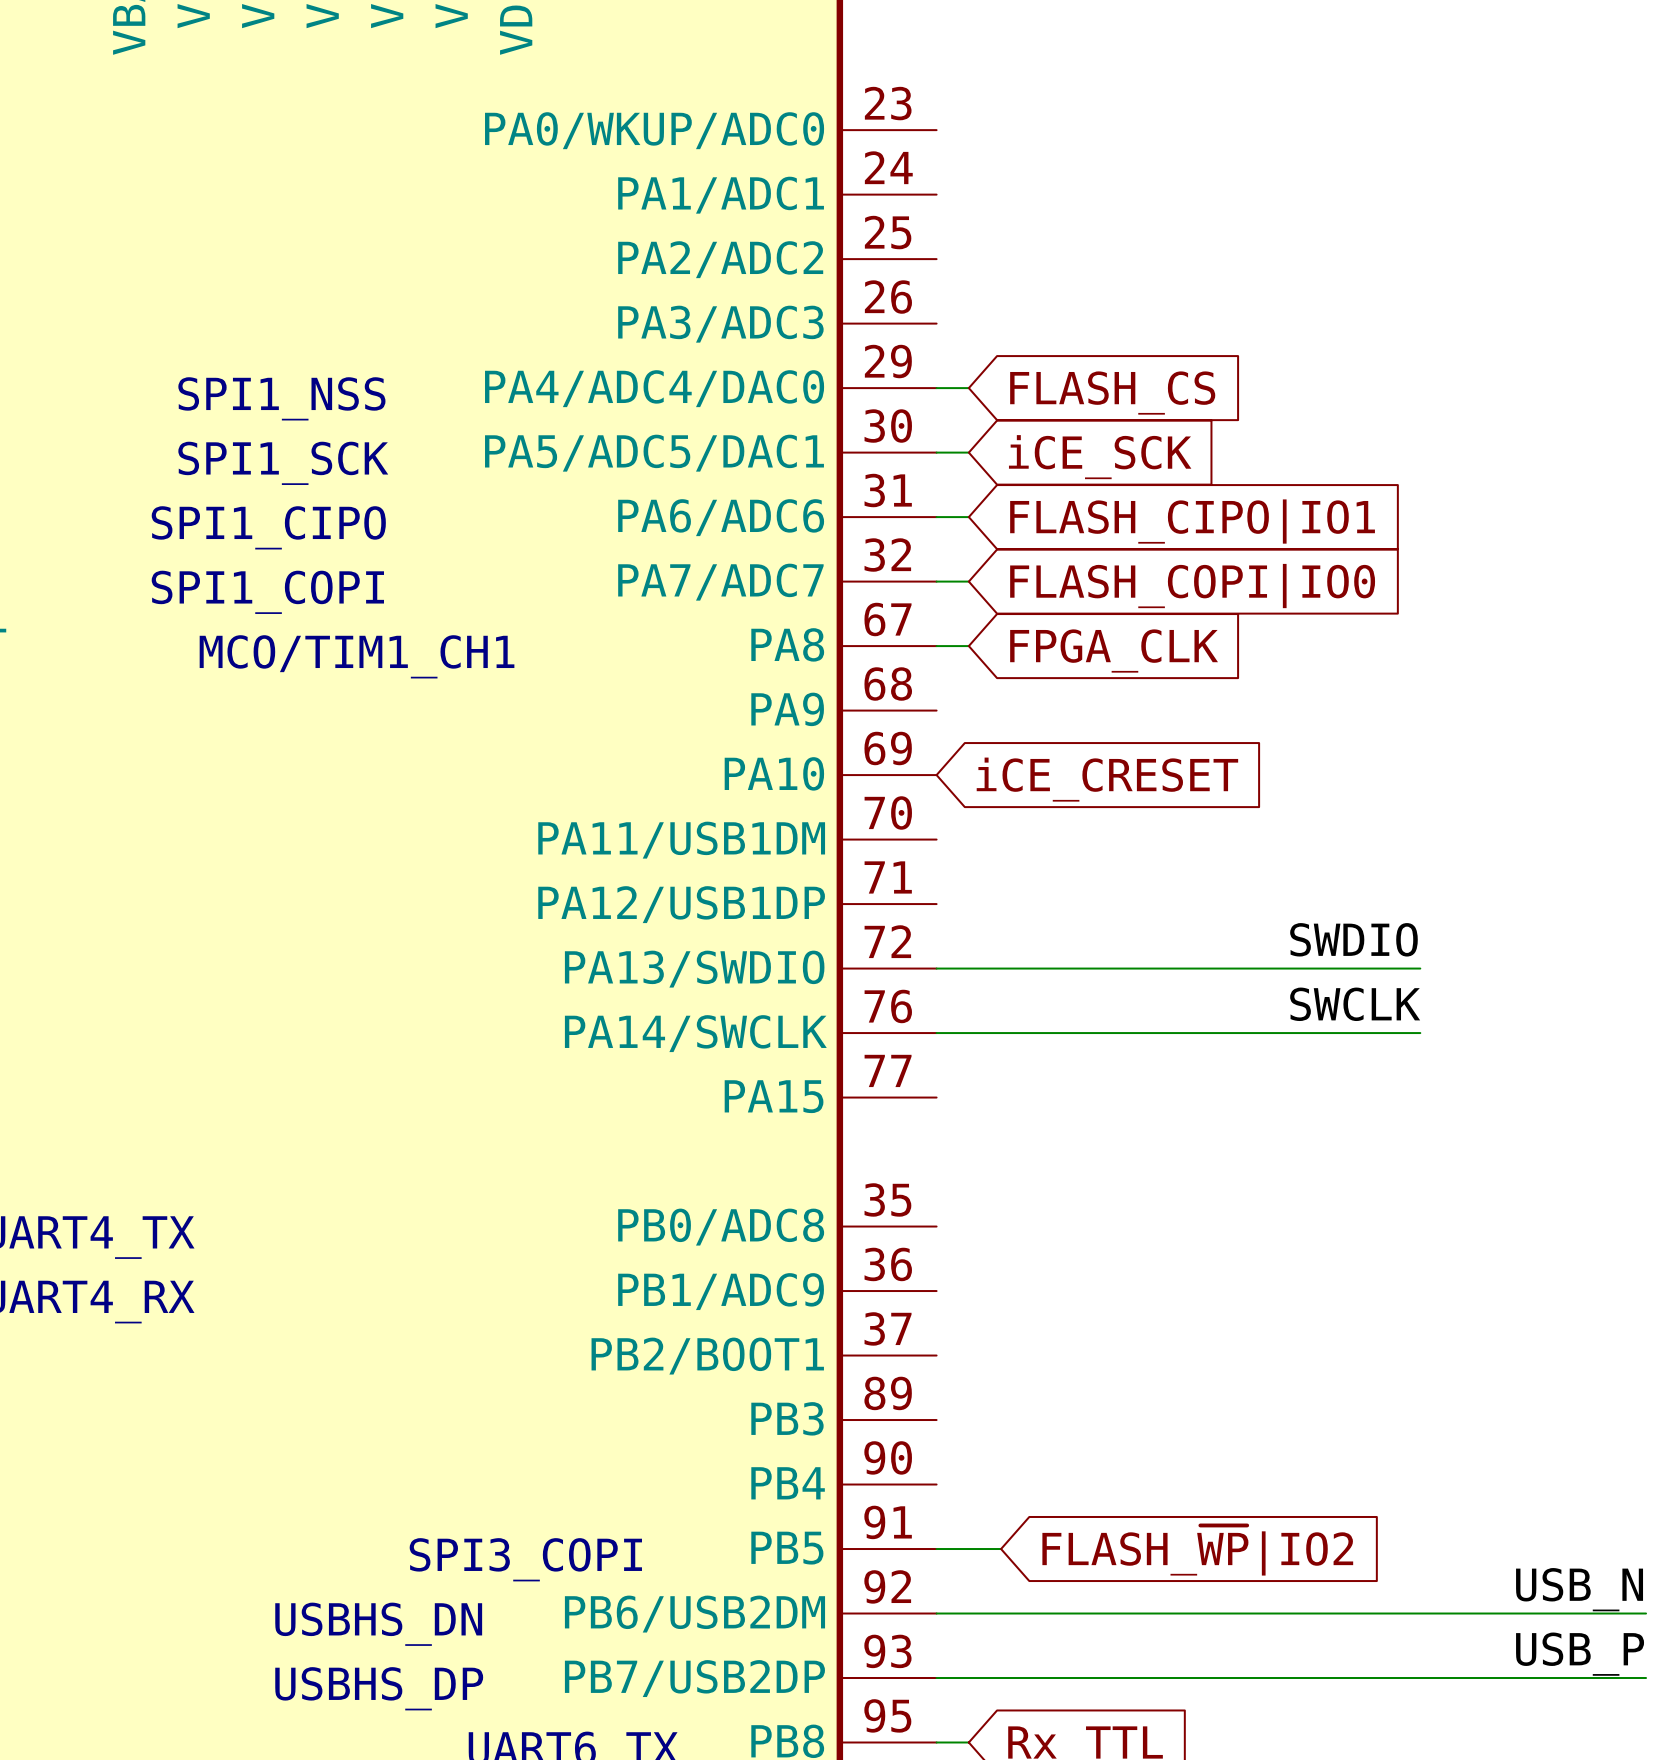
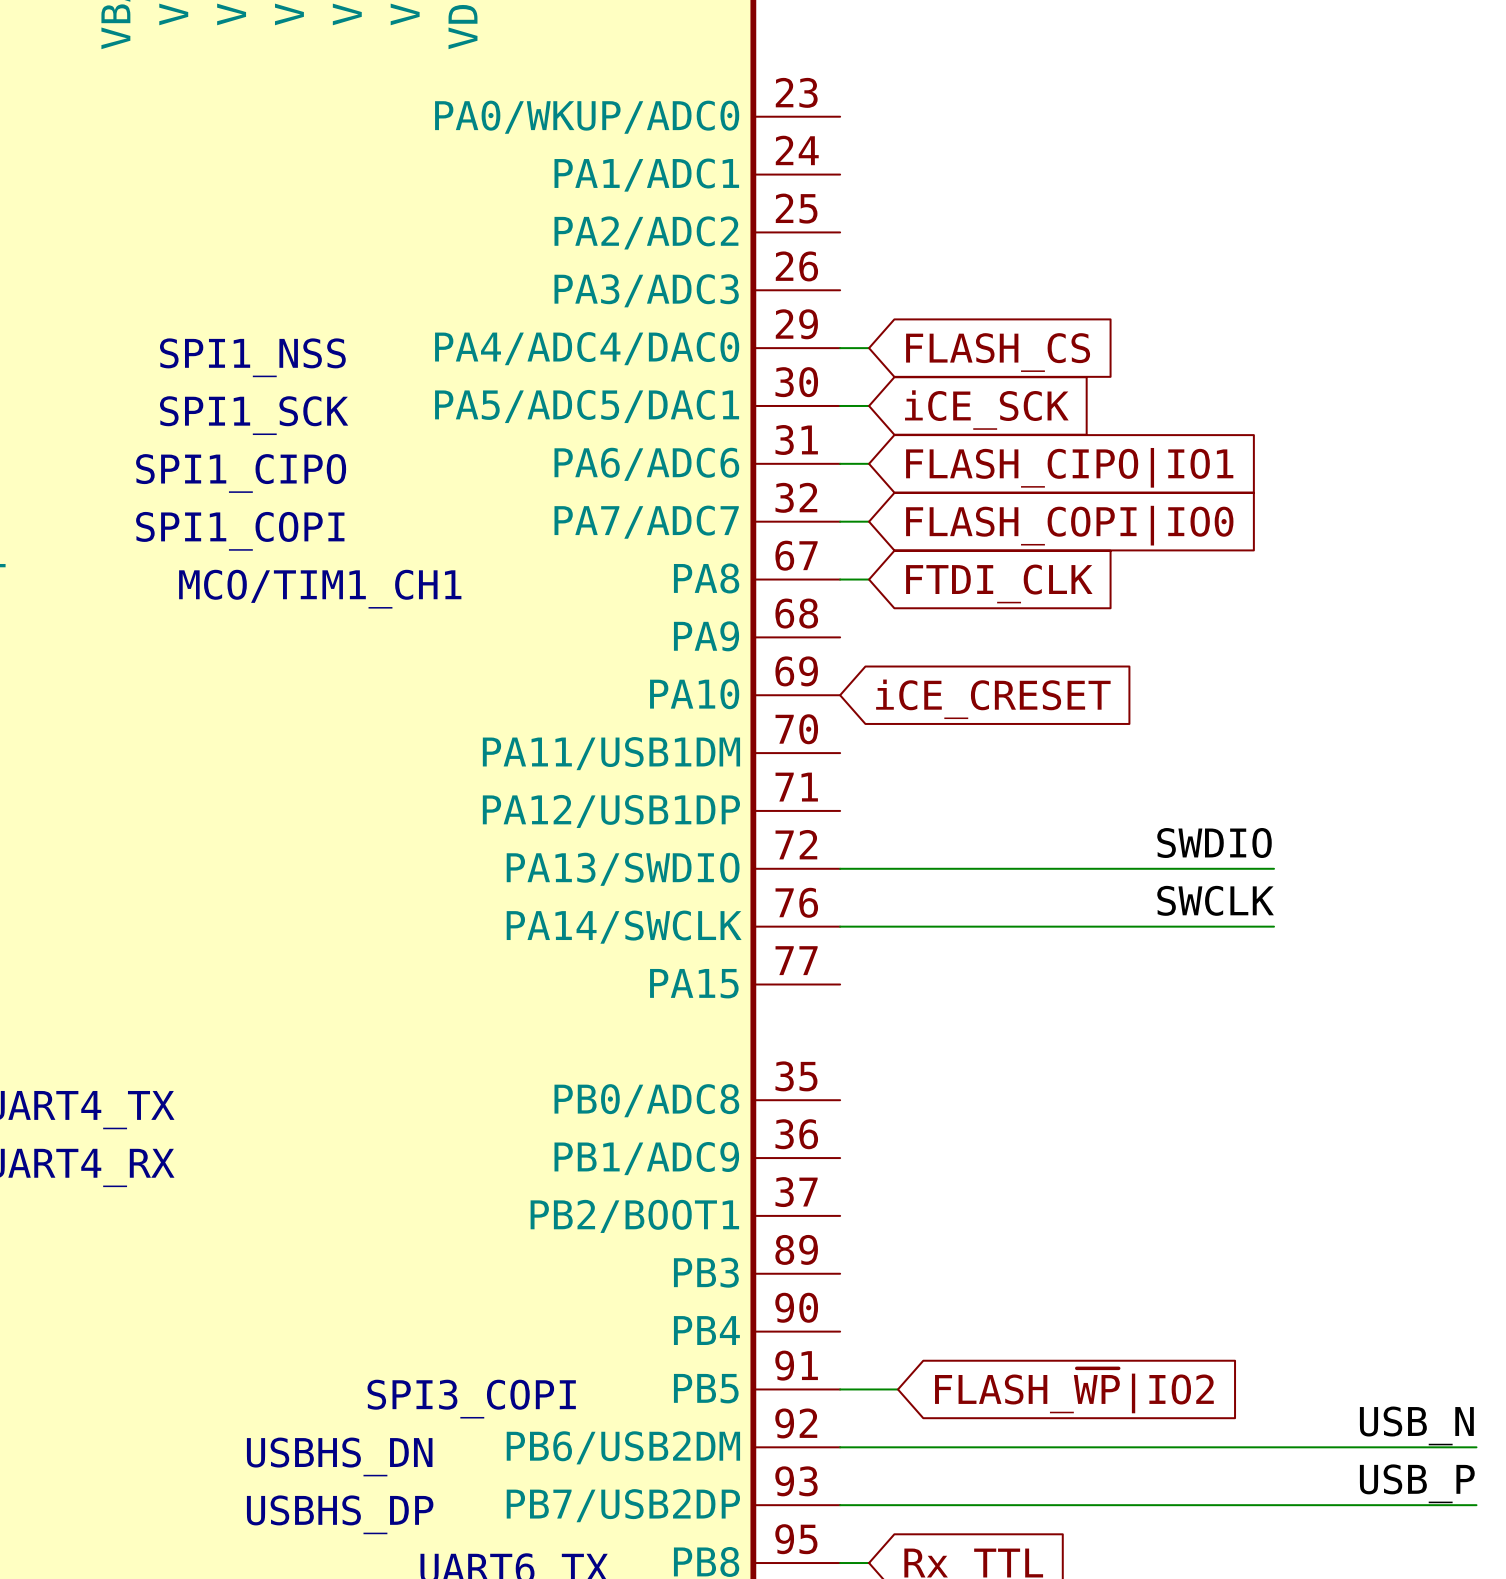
global label: FPGA_CLK (1114, 651) -> FTDI_CLK (999, 583)

